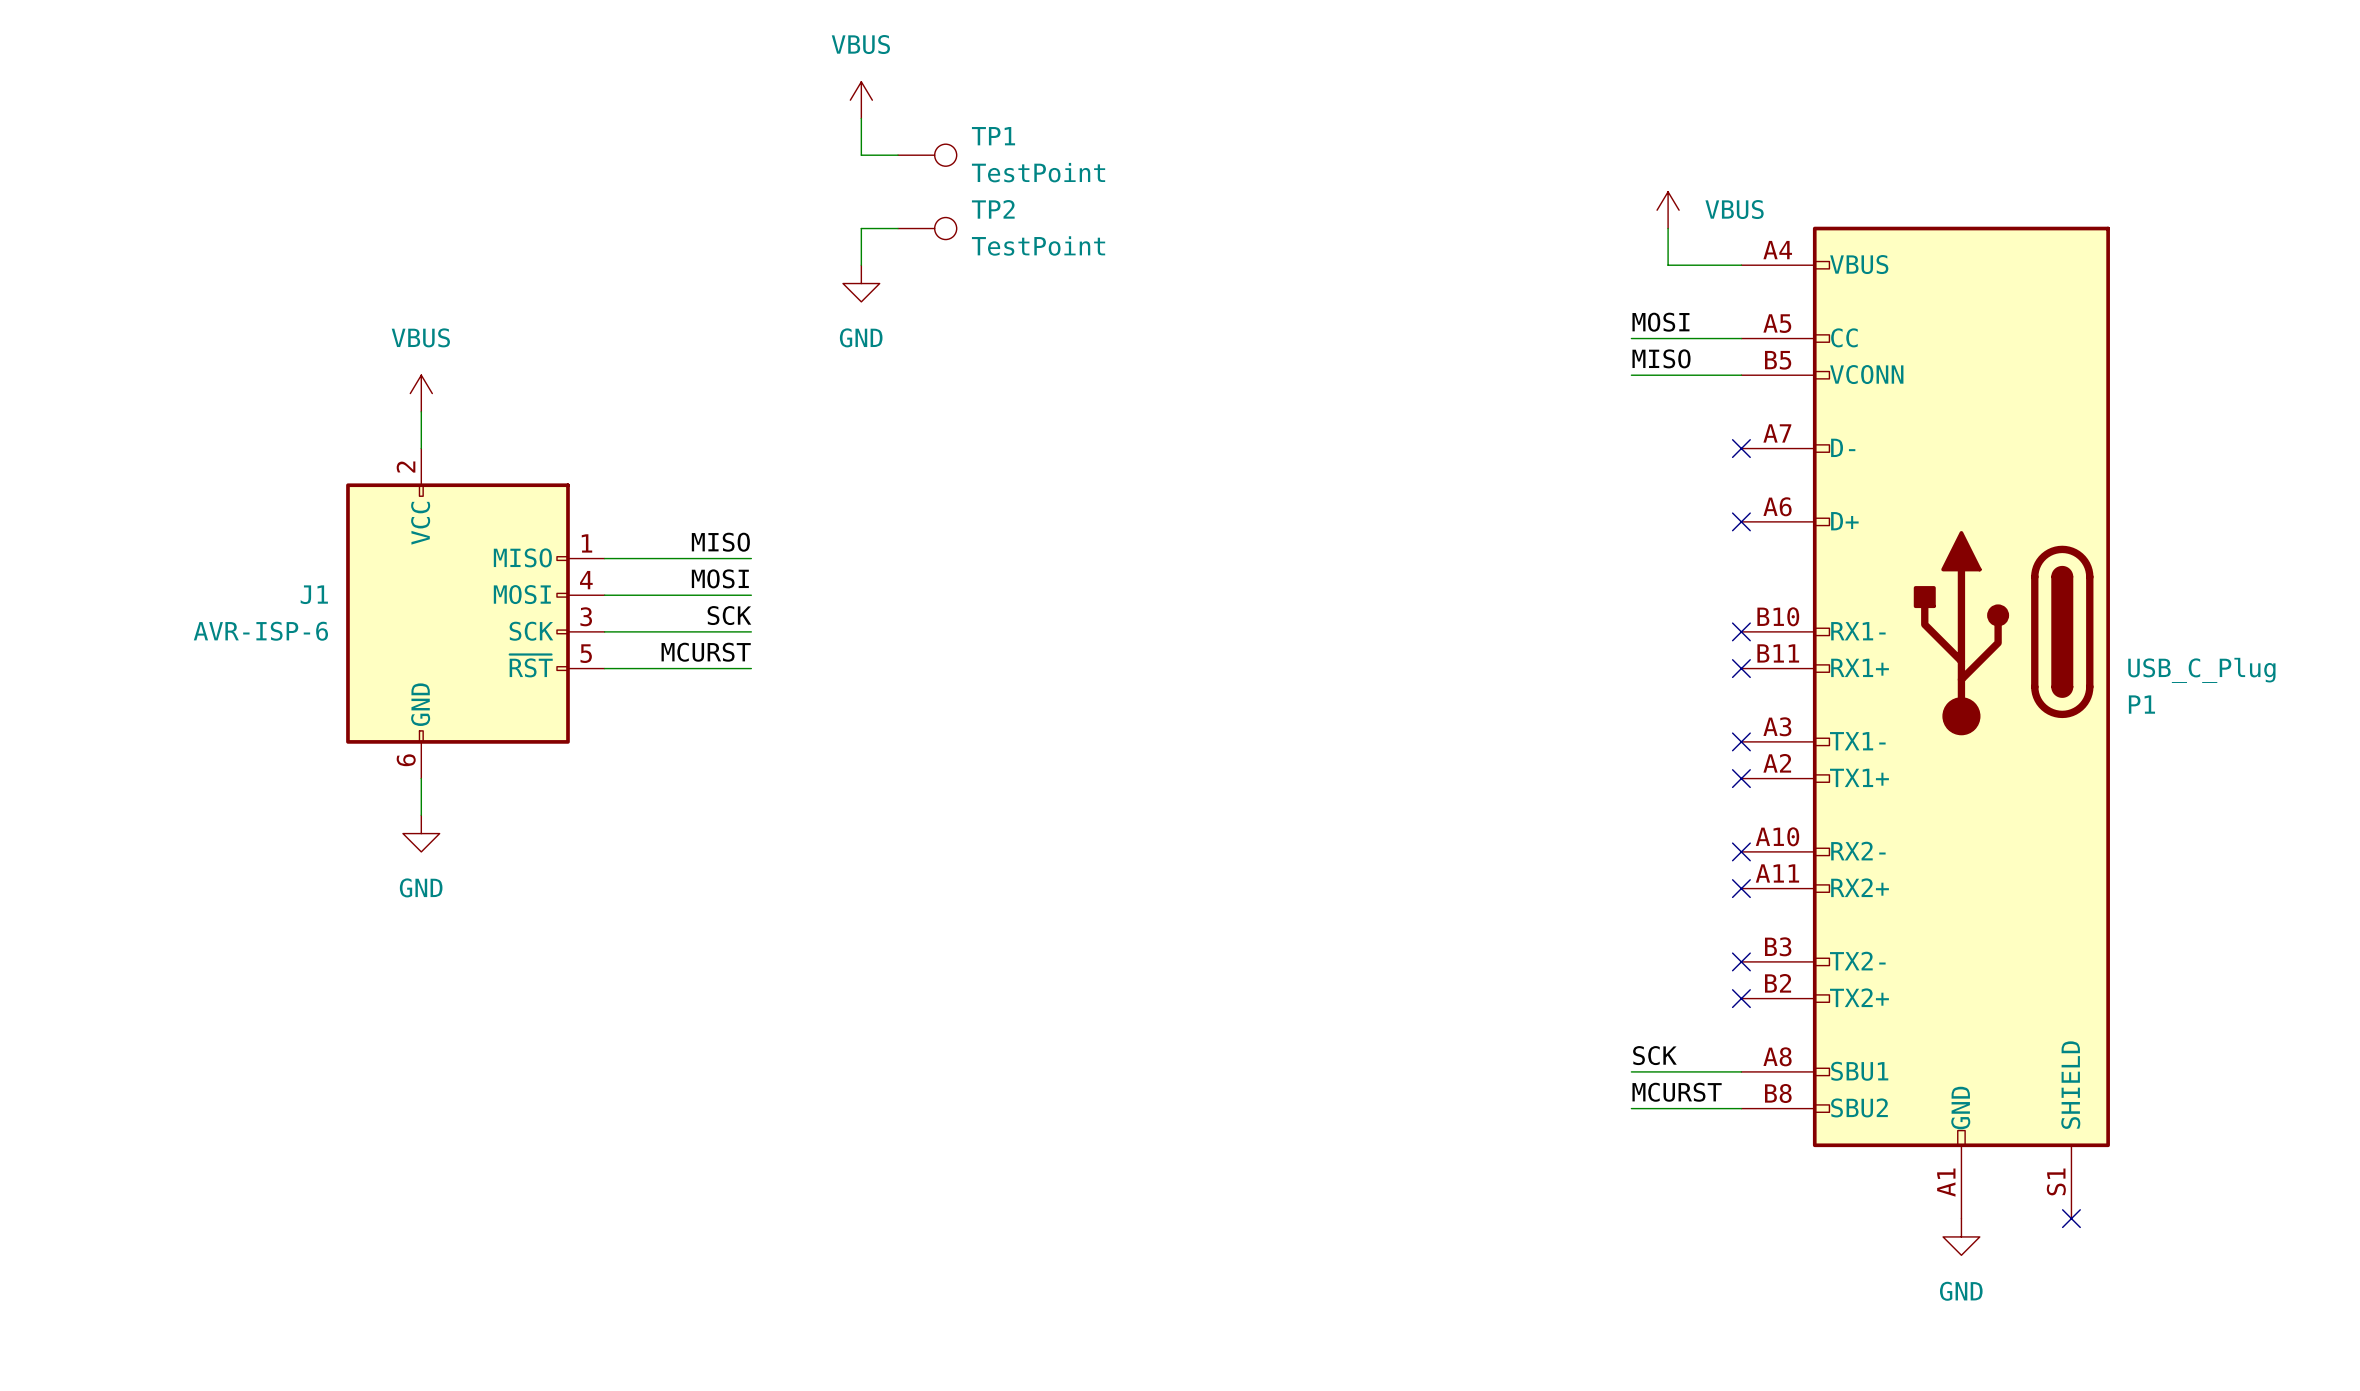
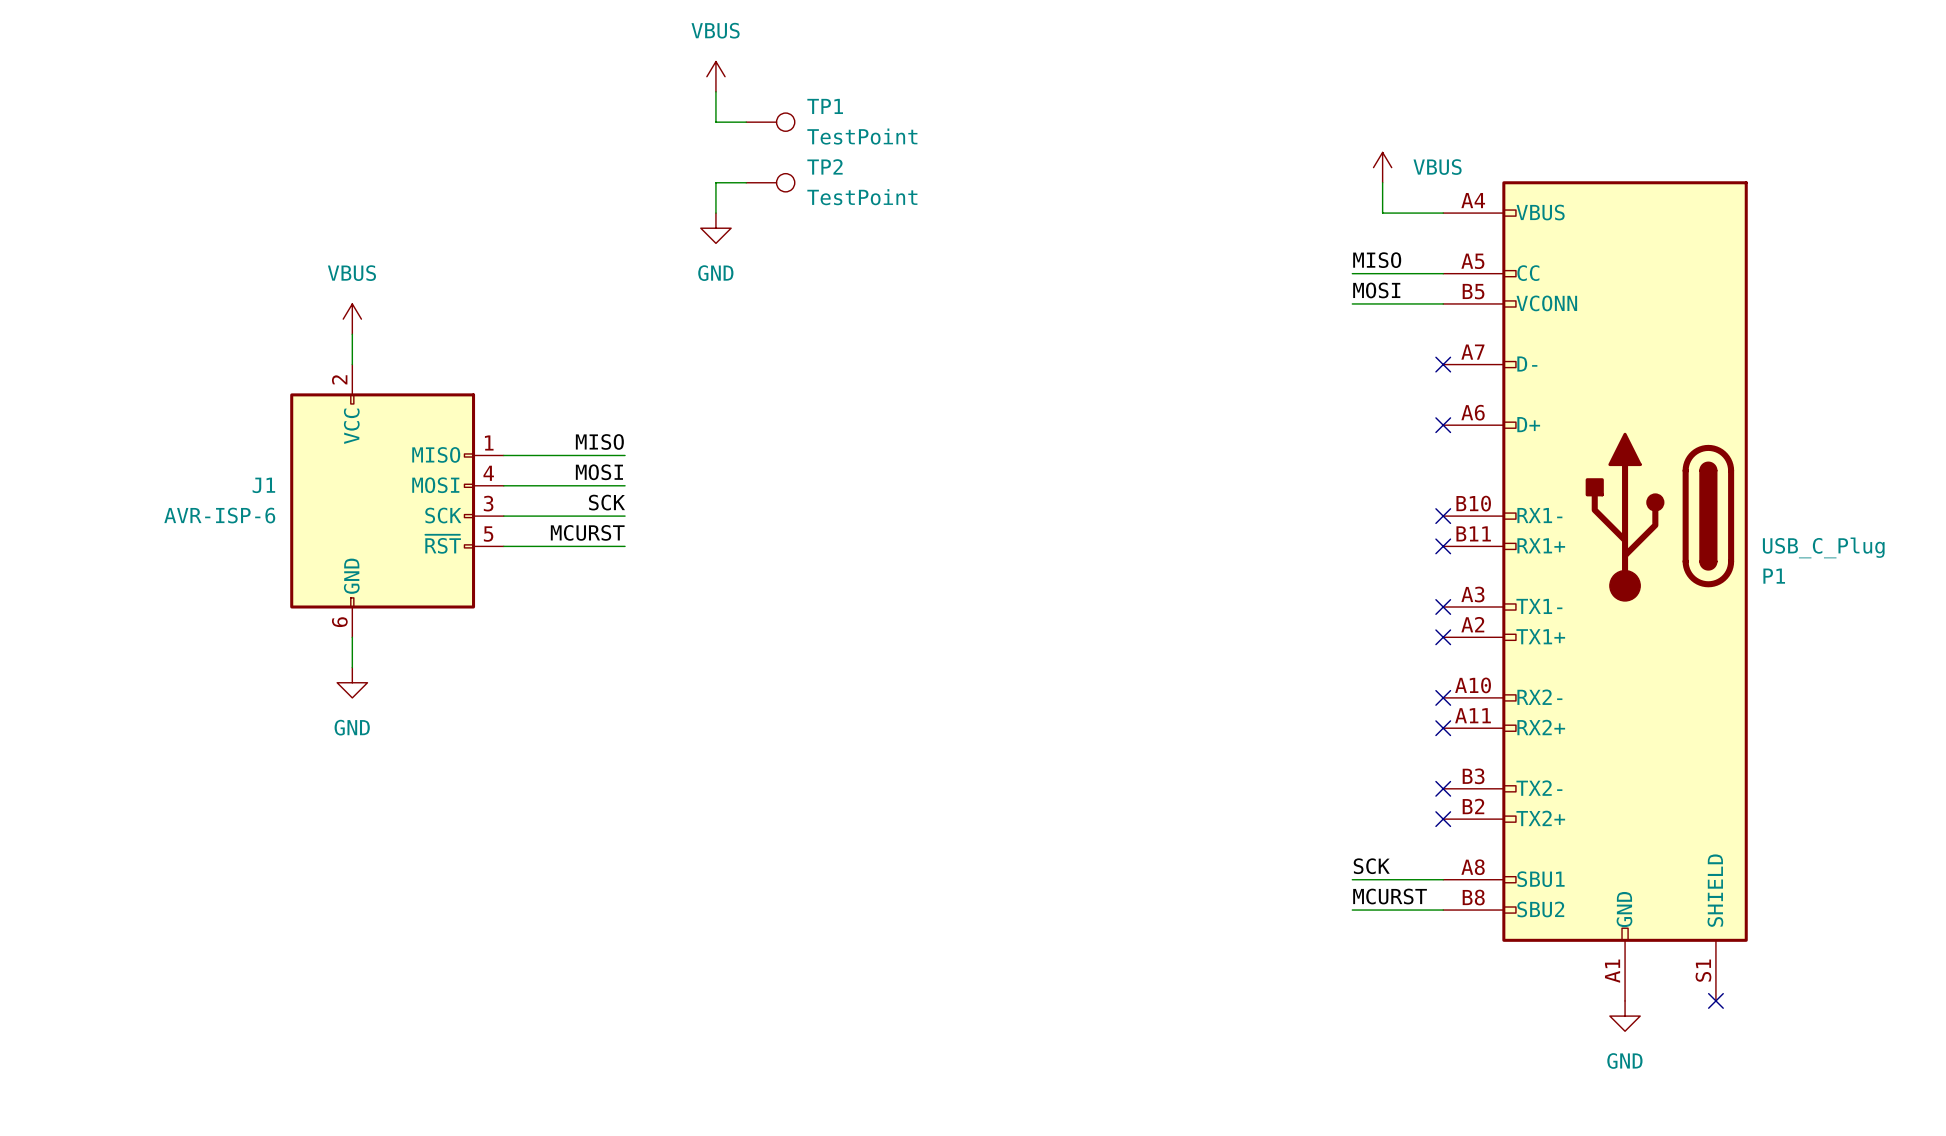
label: MOSI (1660, 322) -> MISO (1377, 260)
label: MISO (1661, 358) -> MOSI (1376, 290)

